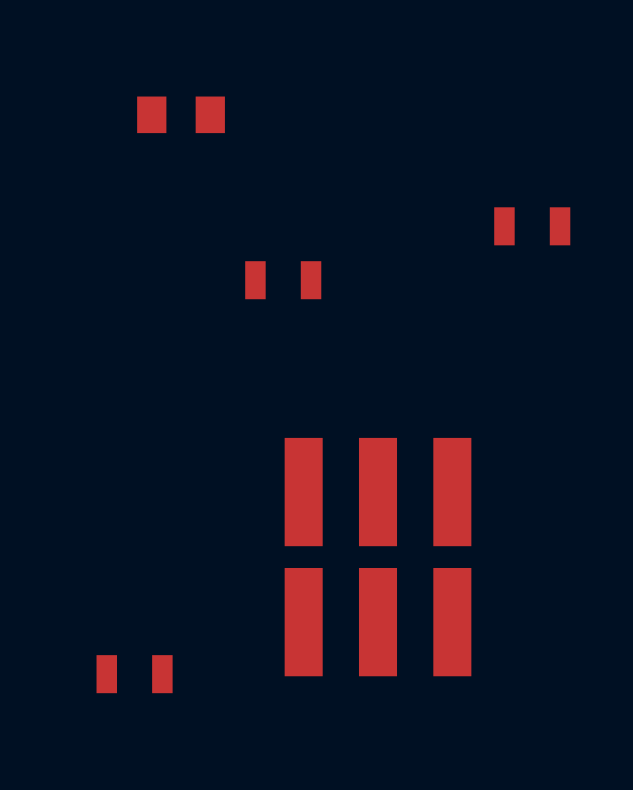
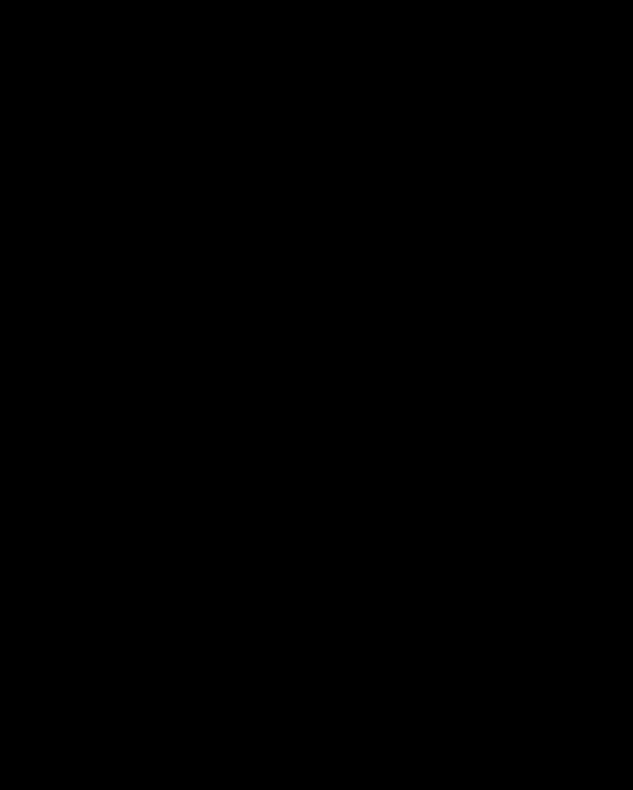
part: (181, 114) -> none
part: (532, 226) -> none
part: (283, 280) -> none
part: (378, 557) -> none
part: (134, 674) -> none

